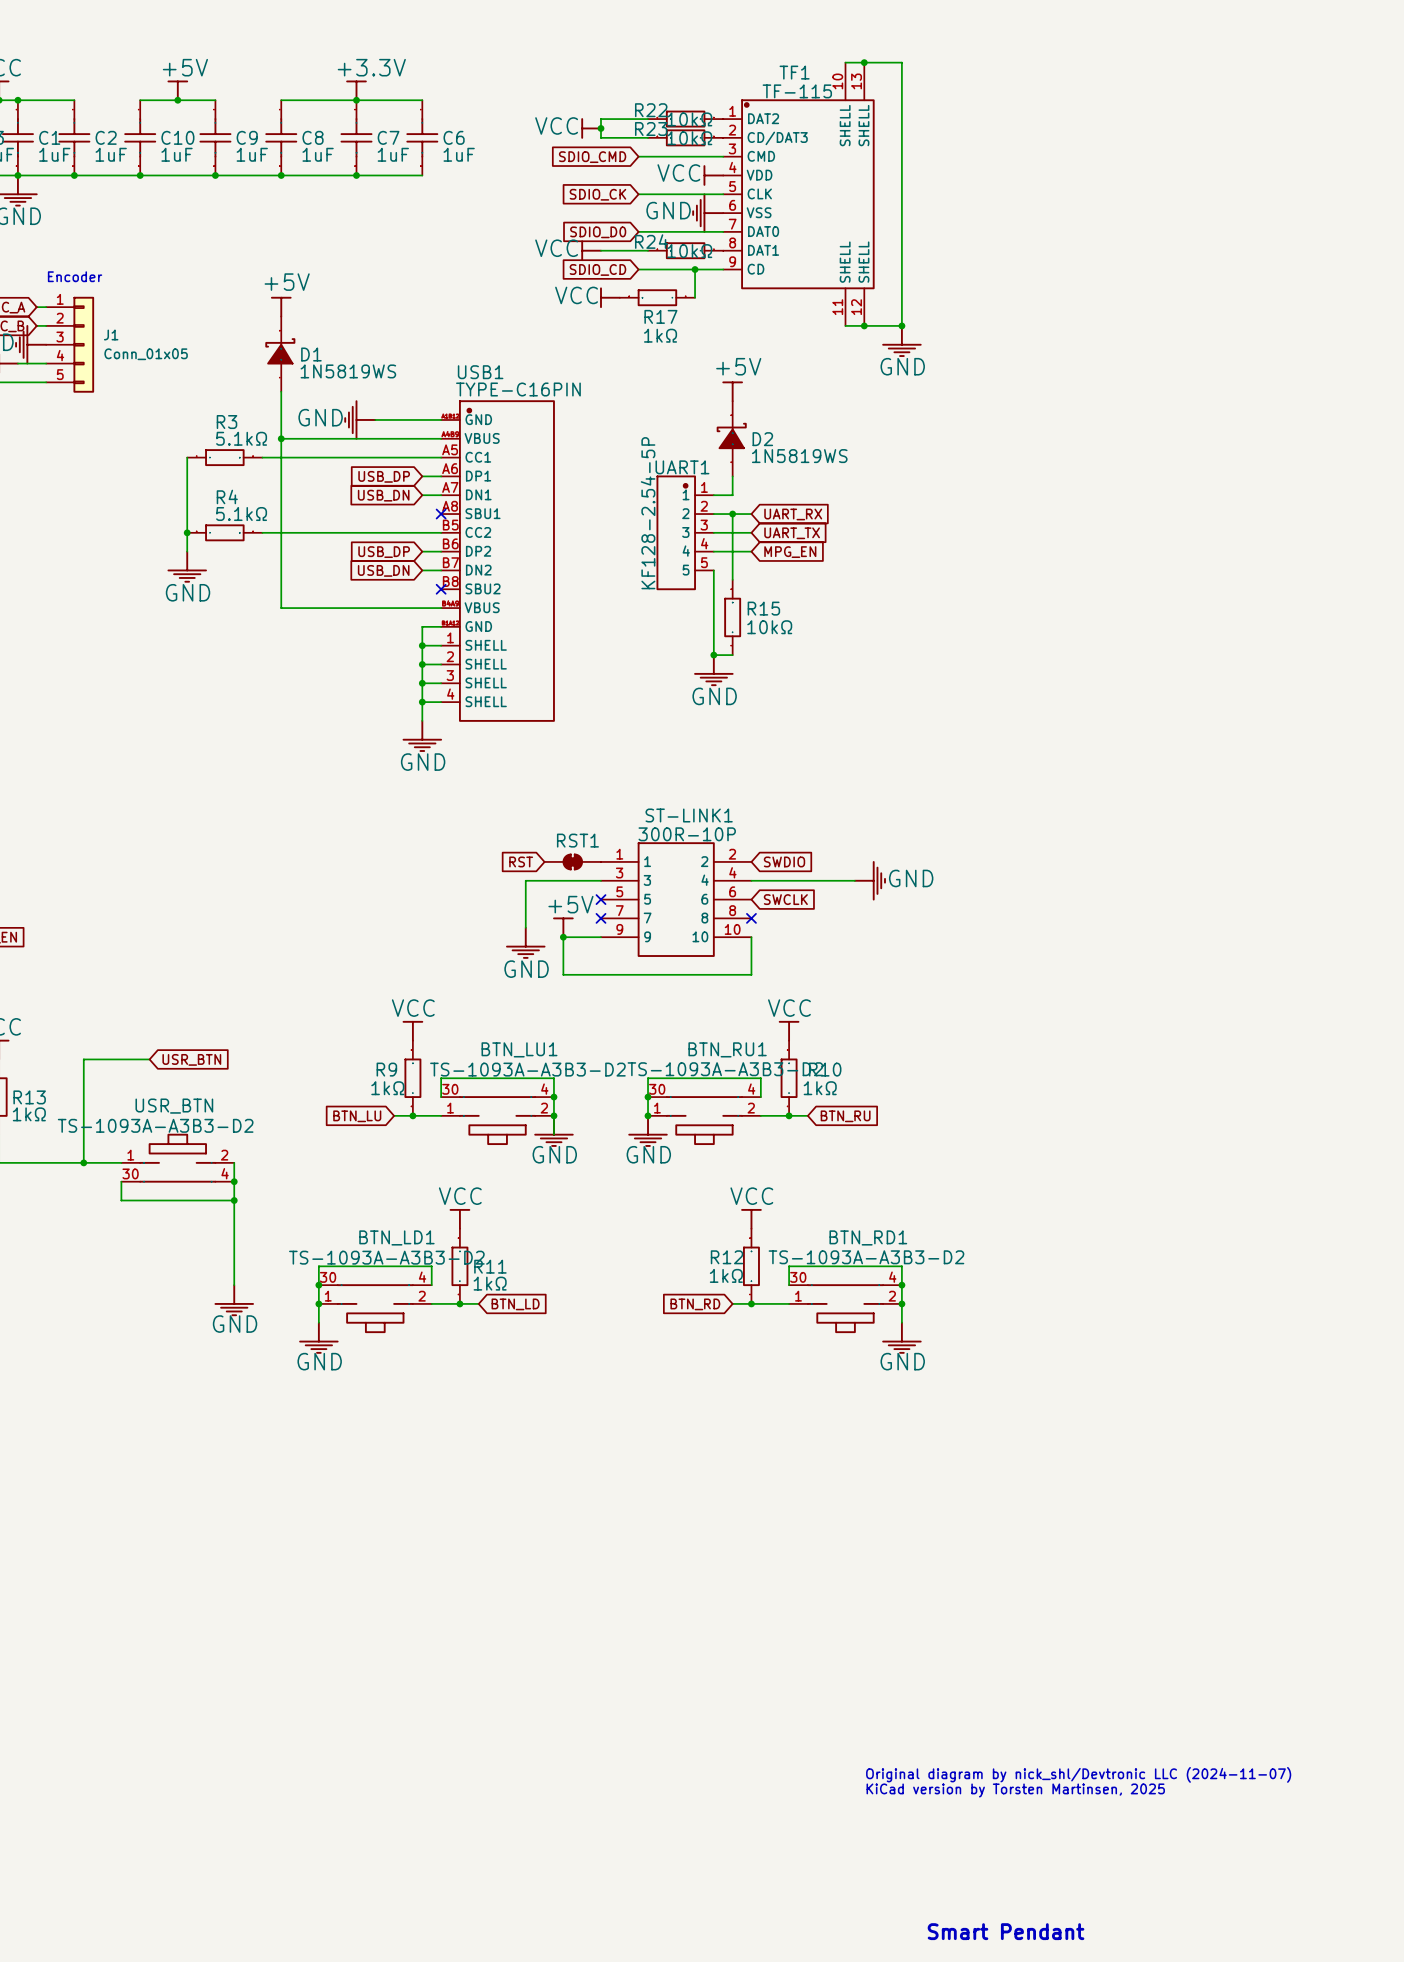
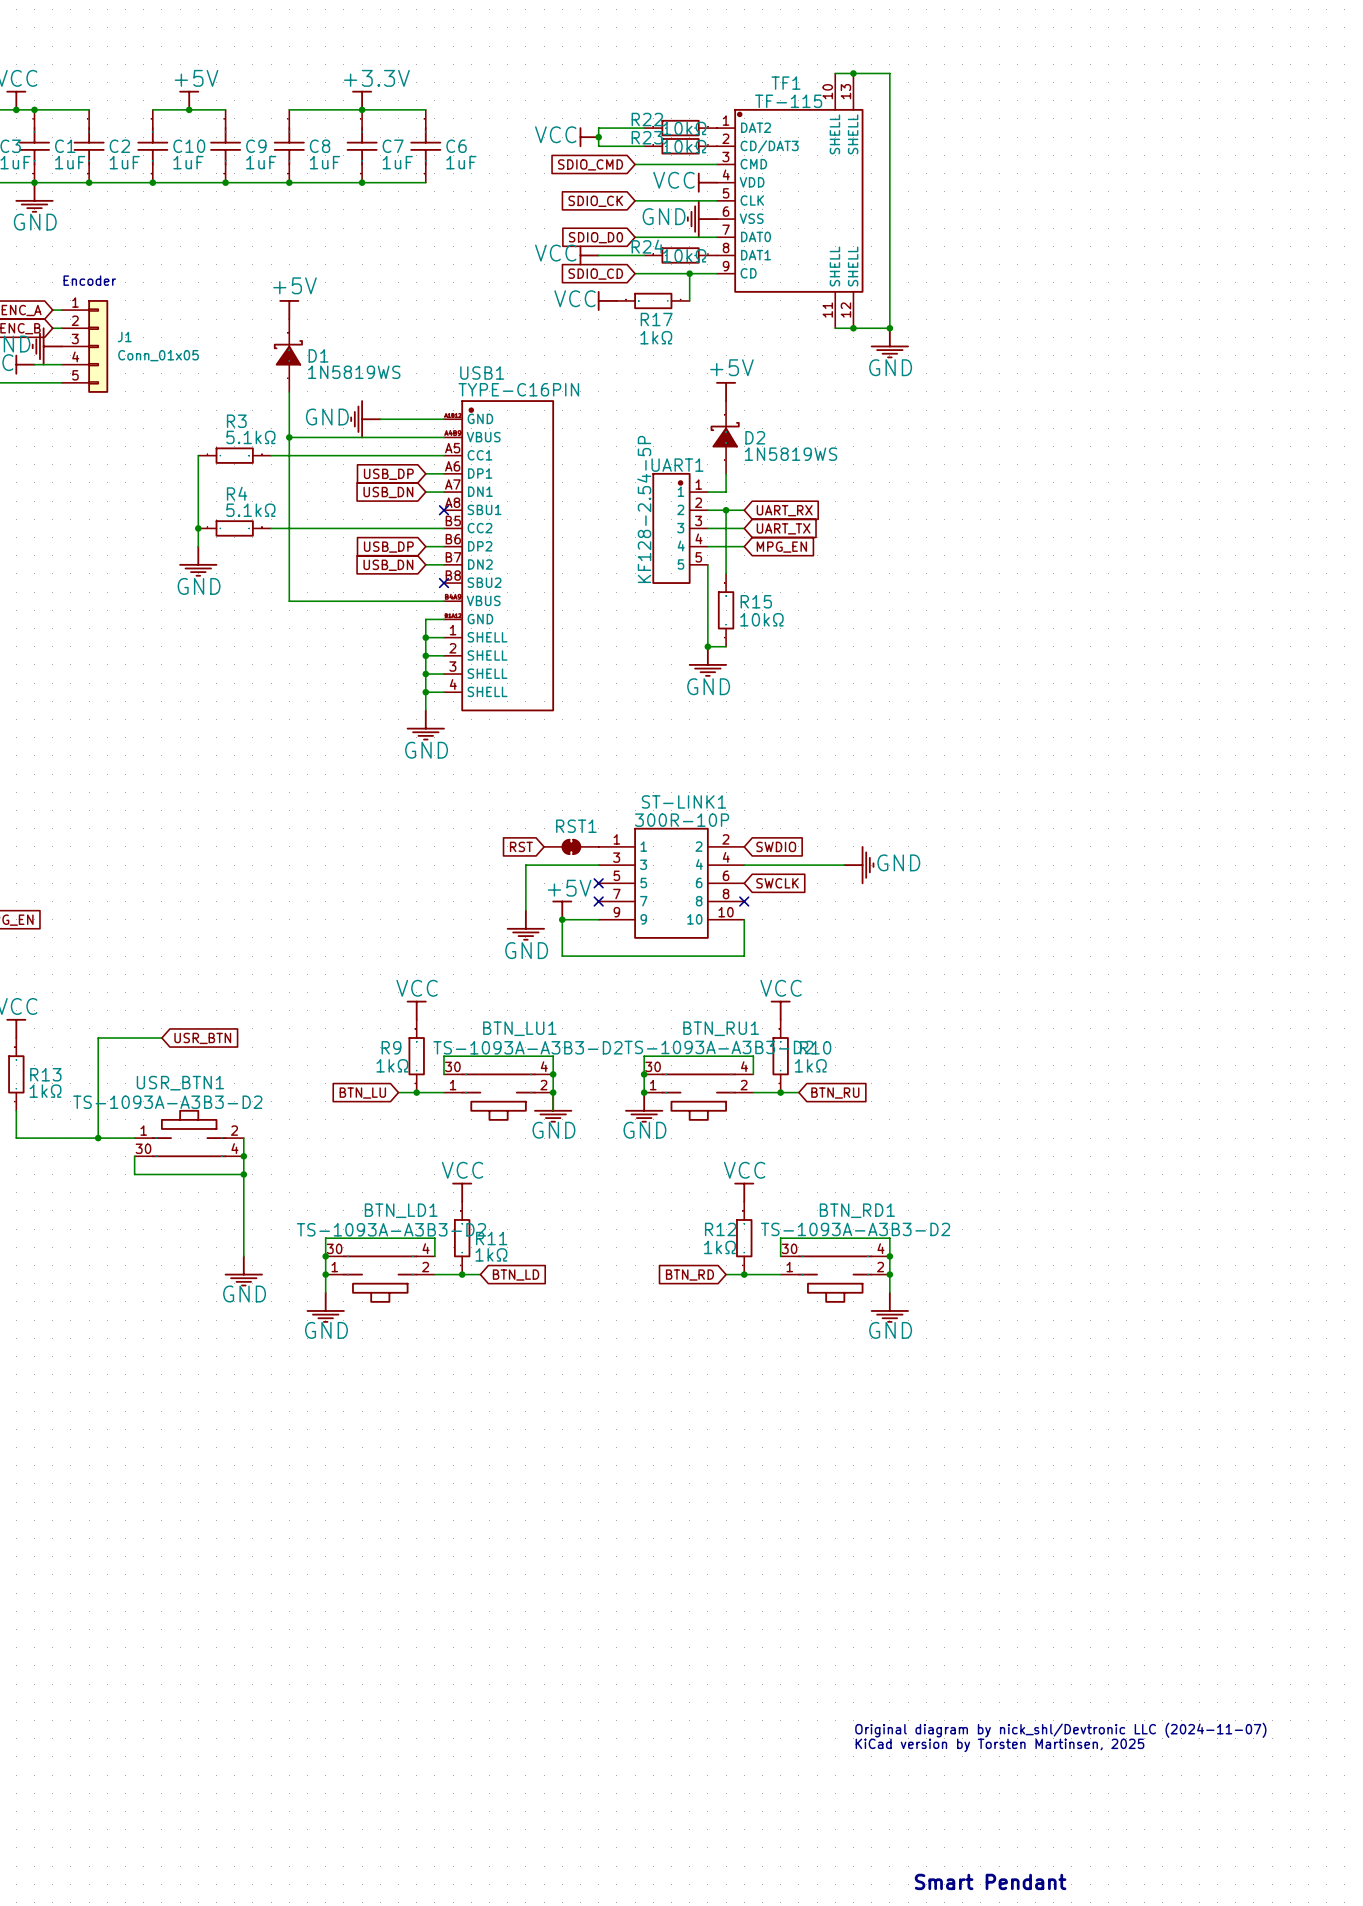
USR_BTN name: USR_BTN (174, 1106) -> USR_BTN1 (180, 1083)

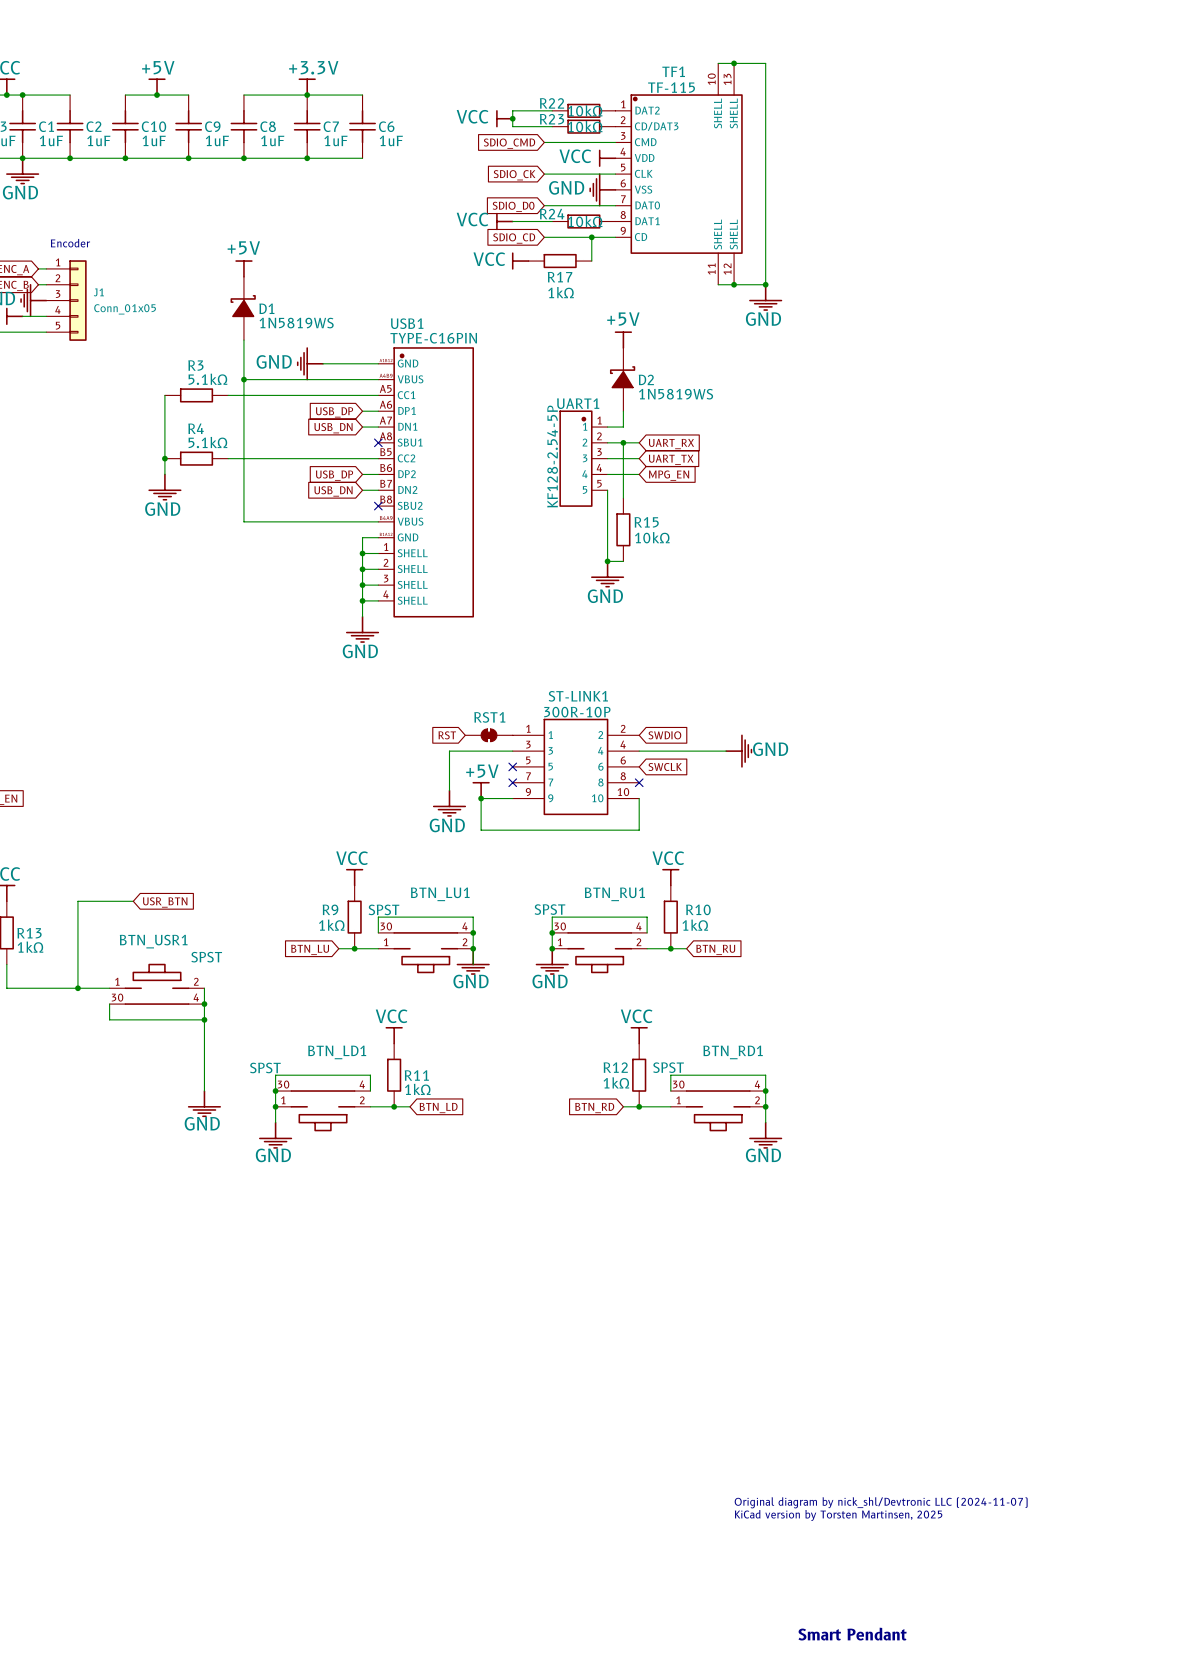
BTN_LU1 value: TS-1093A-A3B3-D2 (527, 1047) -> SPST (383, 909)
BTN_RU1 value: TS-1093A-A3B3-D2 (719, 1047) -> SPST (549, 909)
USR_BTN1 name: USR_BTN1 (180, 1083) -> BTN_USR1 (153, 941)
USR_BTN1 value: TS-1093A-A3B3-D2 (167, 1102) -> SPST (206, 957)
BTN_LD1 value: TS-1093A-A3B3-D2 (391, 1229) -> SPST (265, 1067)
BTN_RD1 value: TS-1093A-A3B3-D2 (855, 1229) -> SPST (668, 1067)

